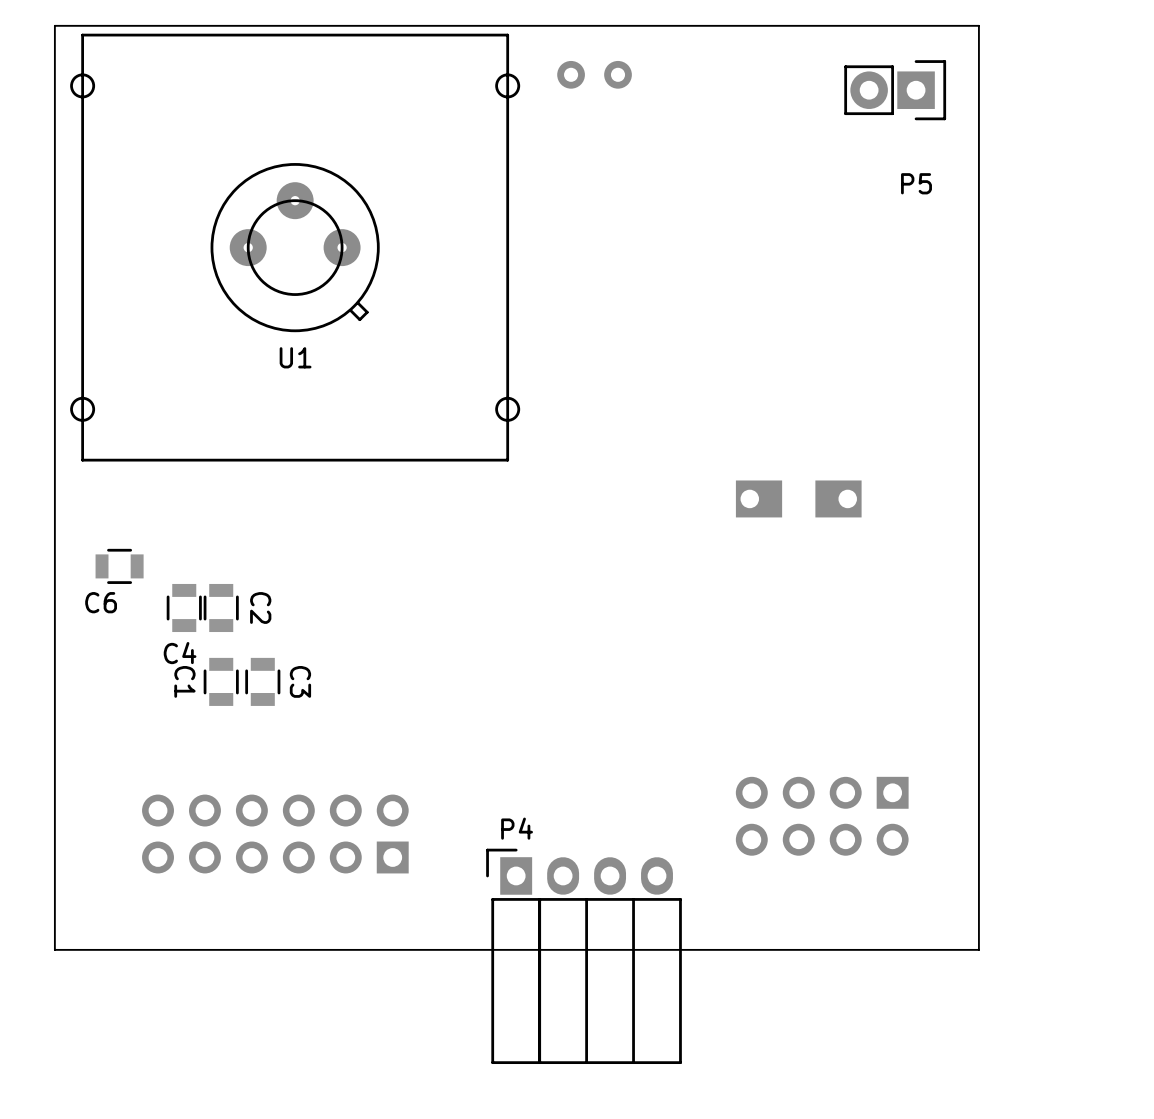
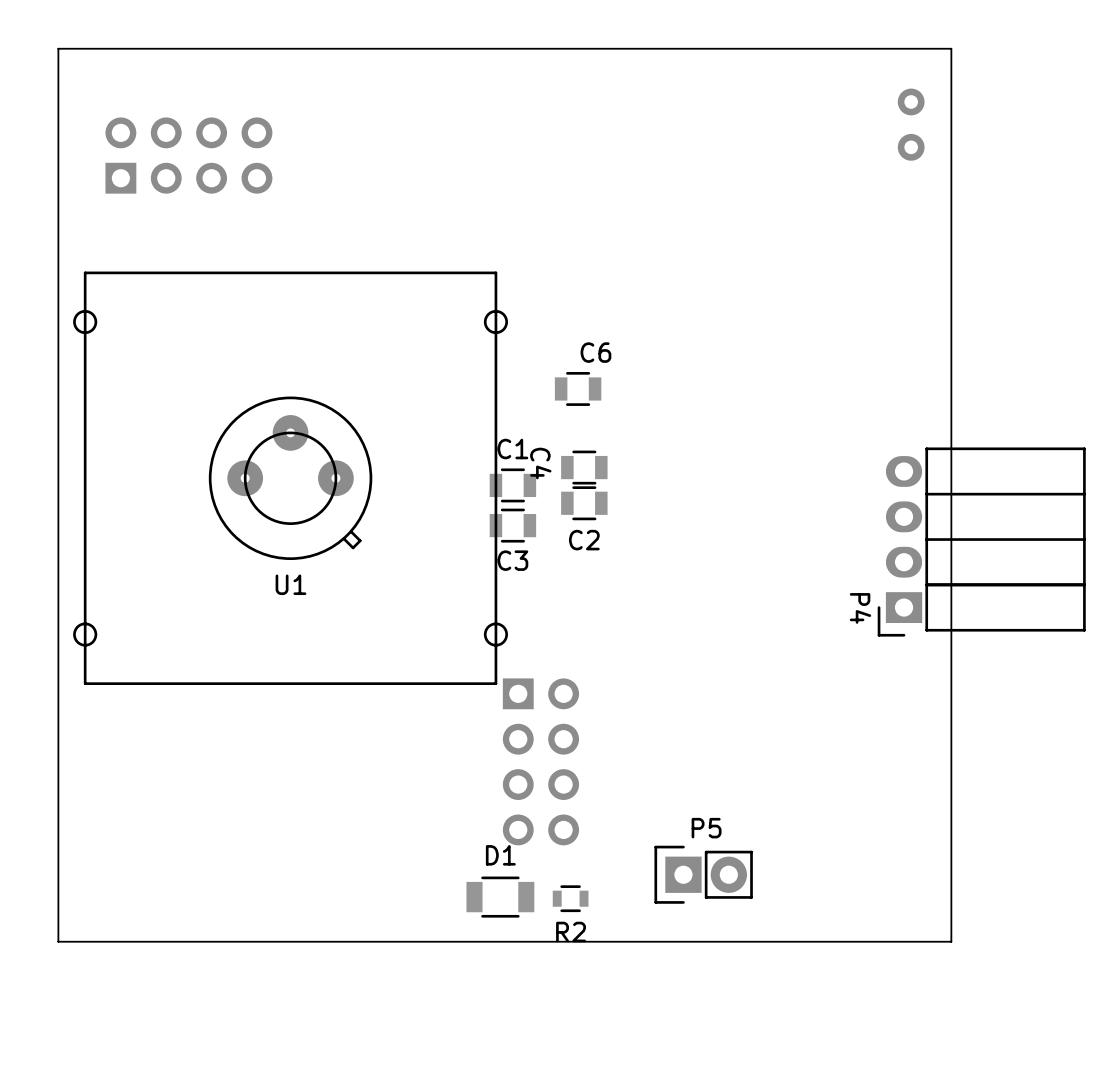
part rotation: 0° (594, 74) -> 90° clockwise (911, 124)
part position: (594, 74) -> (911, 124)
P5 rotation: 0° (895, 90) -> 180° (703, 874)
P5 position: (895, 90) -> (703, 874)
part: none -> (188, 155)
P5 name position: P5 (916, 183) -> P5 (706, 828)
U1 position: (295, 247) -> (290, 478)
part: (798, 498) -> none
C6 position: (119, 566) -> (578, 388)
C6 name position: C6 (101, 602) -> C6 (595, 352)
C4 rotation: 0° (184, 607) -> 90° clockwise (584, 467)
C4 position: (184, 607) -> (584, 467)
C2 rotation: 0° (221, 607) -> 90° clockwise (584, 503)
C2 position: (221, 607) -> (584, 503)
C1 rotation: 0° (221, 681) -> 90° clockwise (512, 485)
C1 position: (221, 681) -> (512, 485)
C3 rotation: 0° (262, 681) -> 90° clockwise (512, 525)
C3 position: (262, 681) -> (512, 525)
part rotation: 0° (822, 816) -> 90° counterclockwise (540, 761)
part position: (822, 816) -> (540, 761)
part: (275, 834) -> none
D1: none -> (500, 897)
R2: none -> (570, 898)
P4 rotation: 0° (584, 956) -> 90° counterclockwise (981, 542)
P4 position: (584, 956) -> (981, 542)

